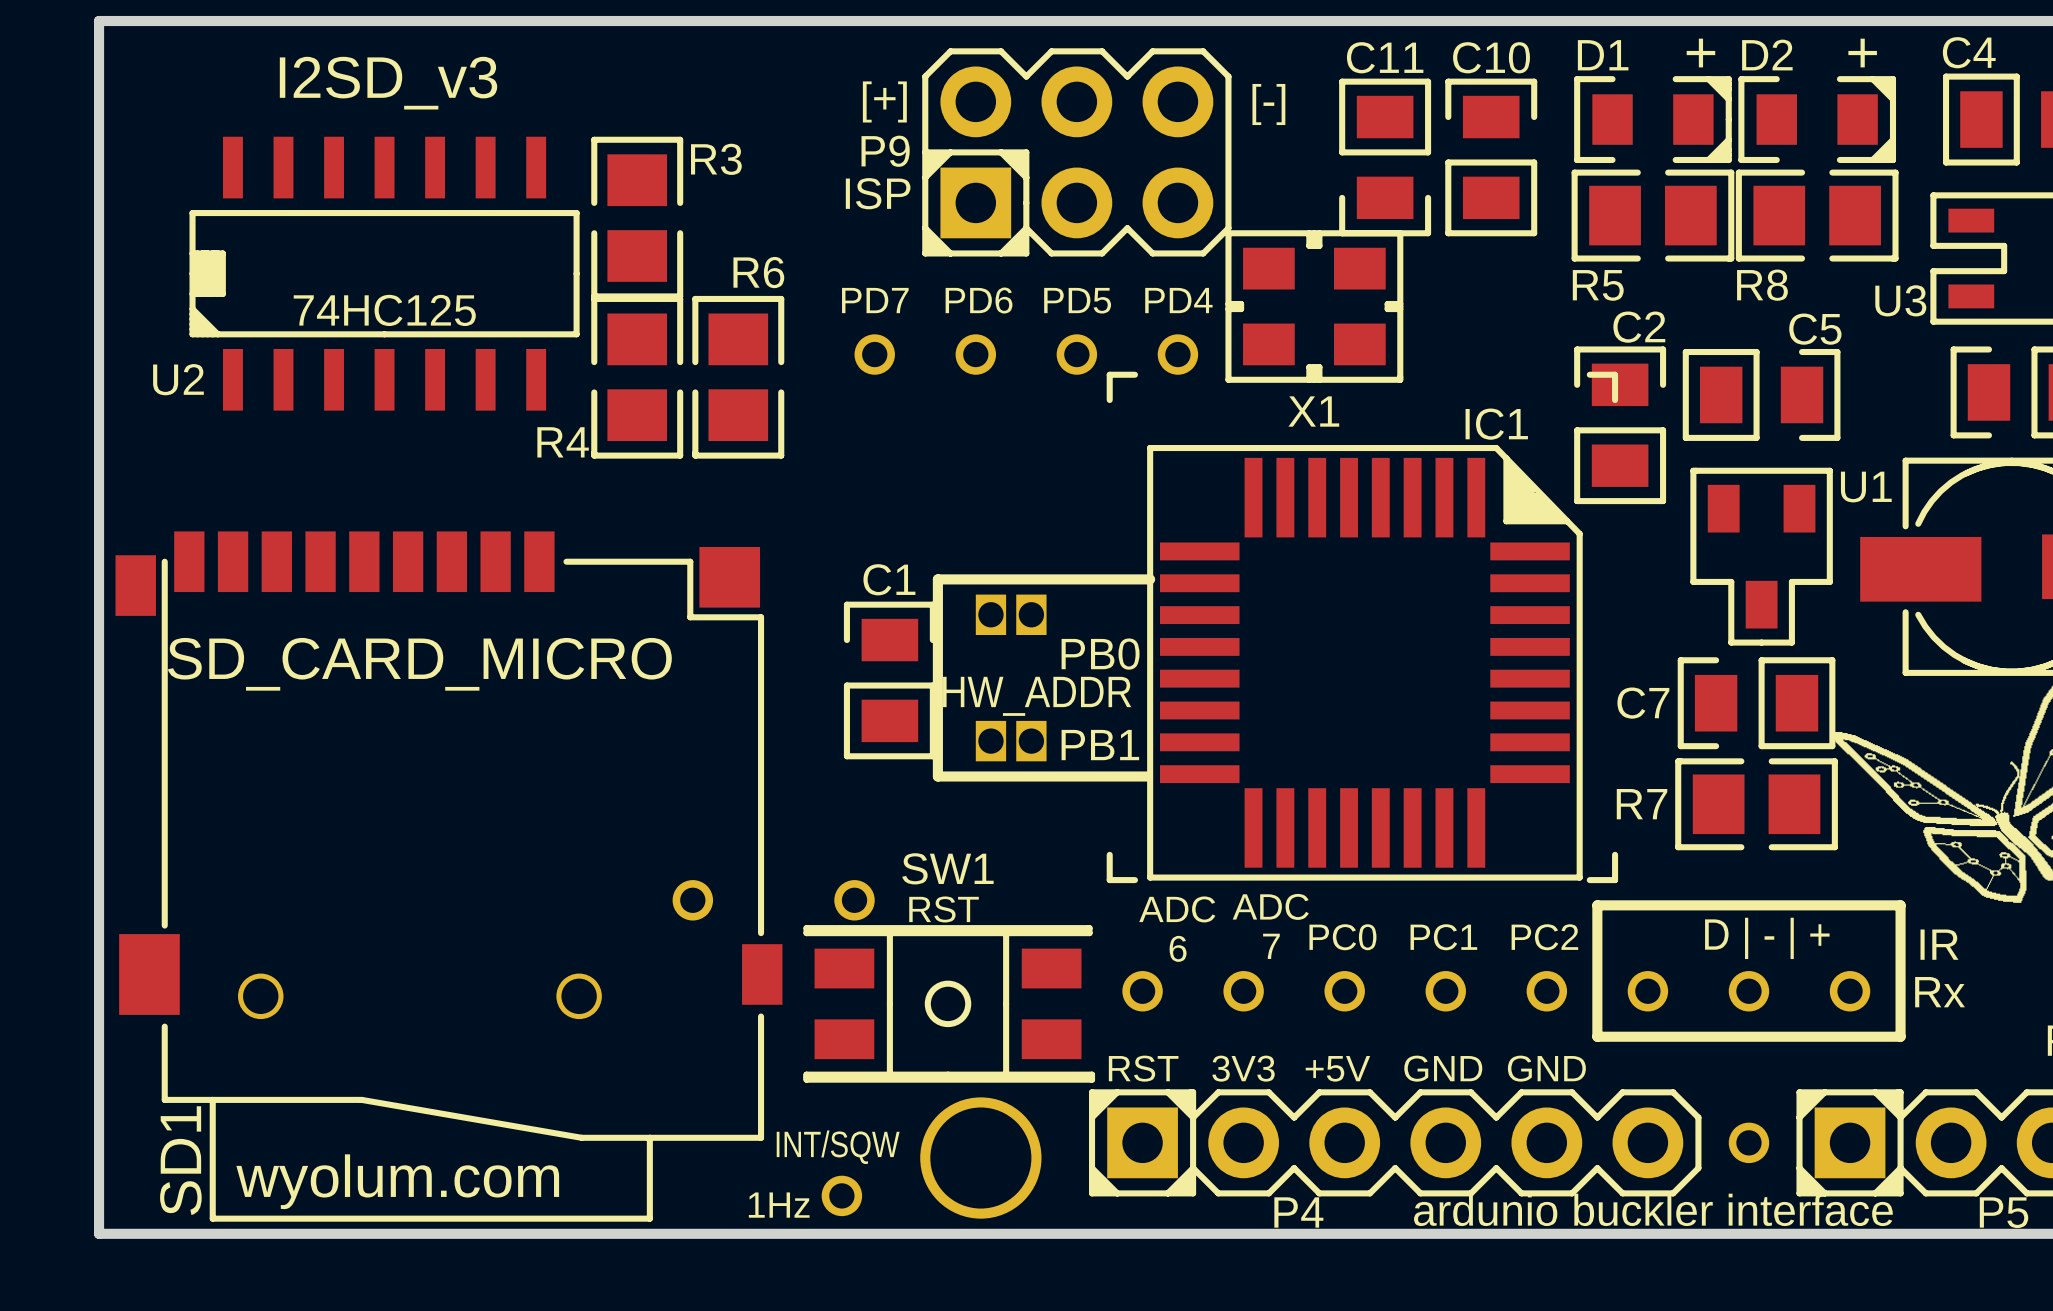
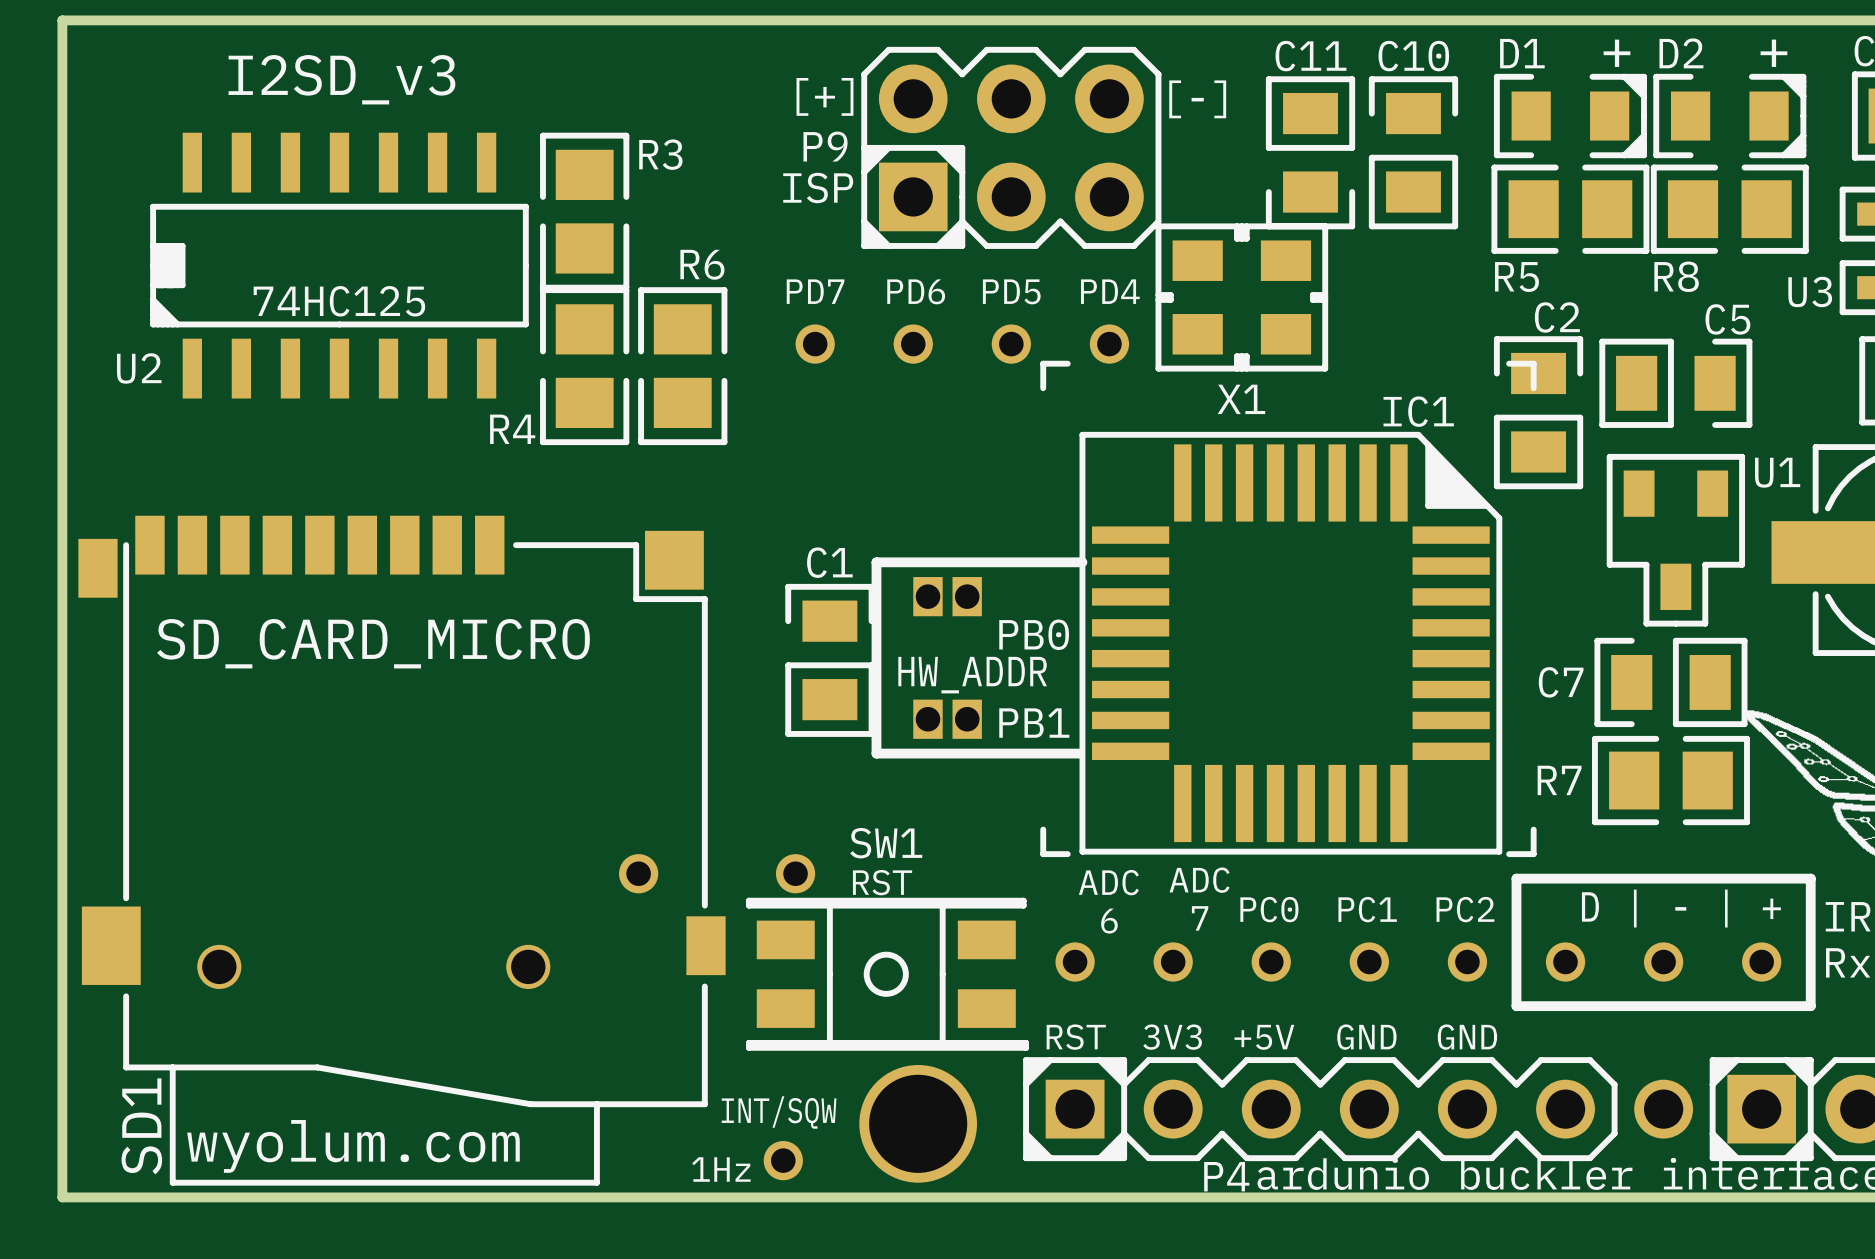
P4 footprint: [1089, 1089, 1702, 1197] -> [1023, 1057, 1618, 1162]
part footprint: [1728, 1122, 1770, 1164] -> [1634, 1079, 1694, 1139]

